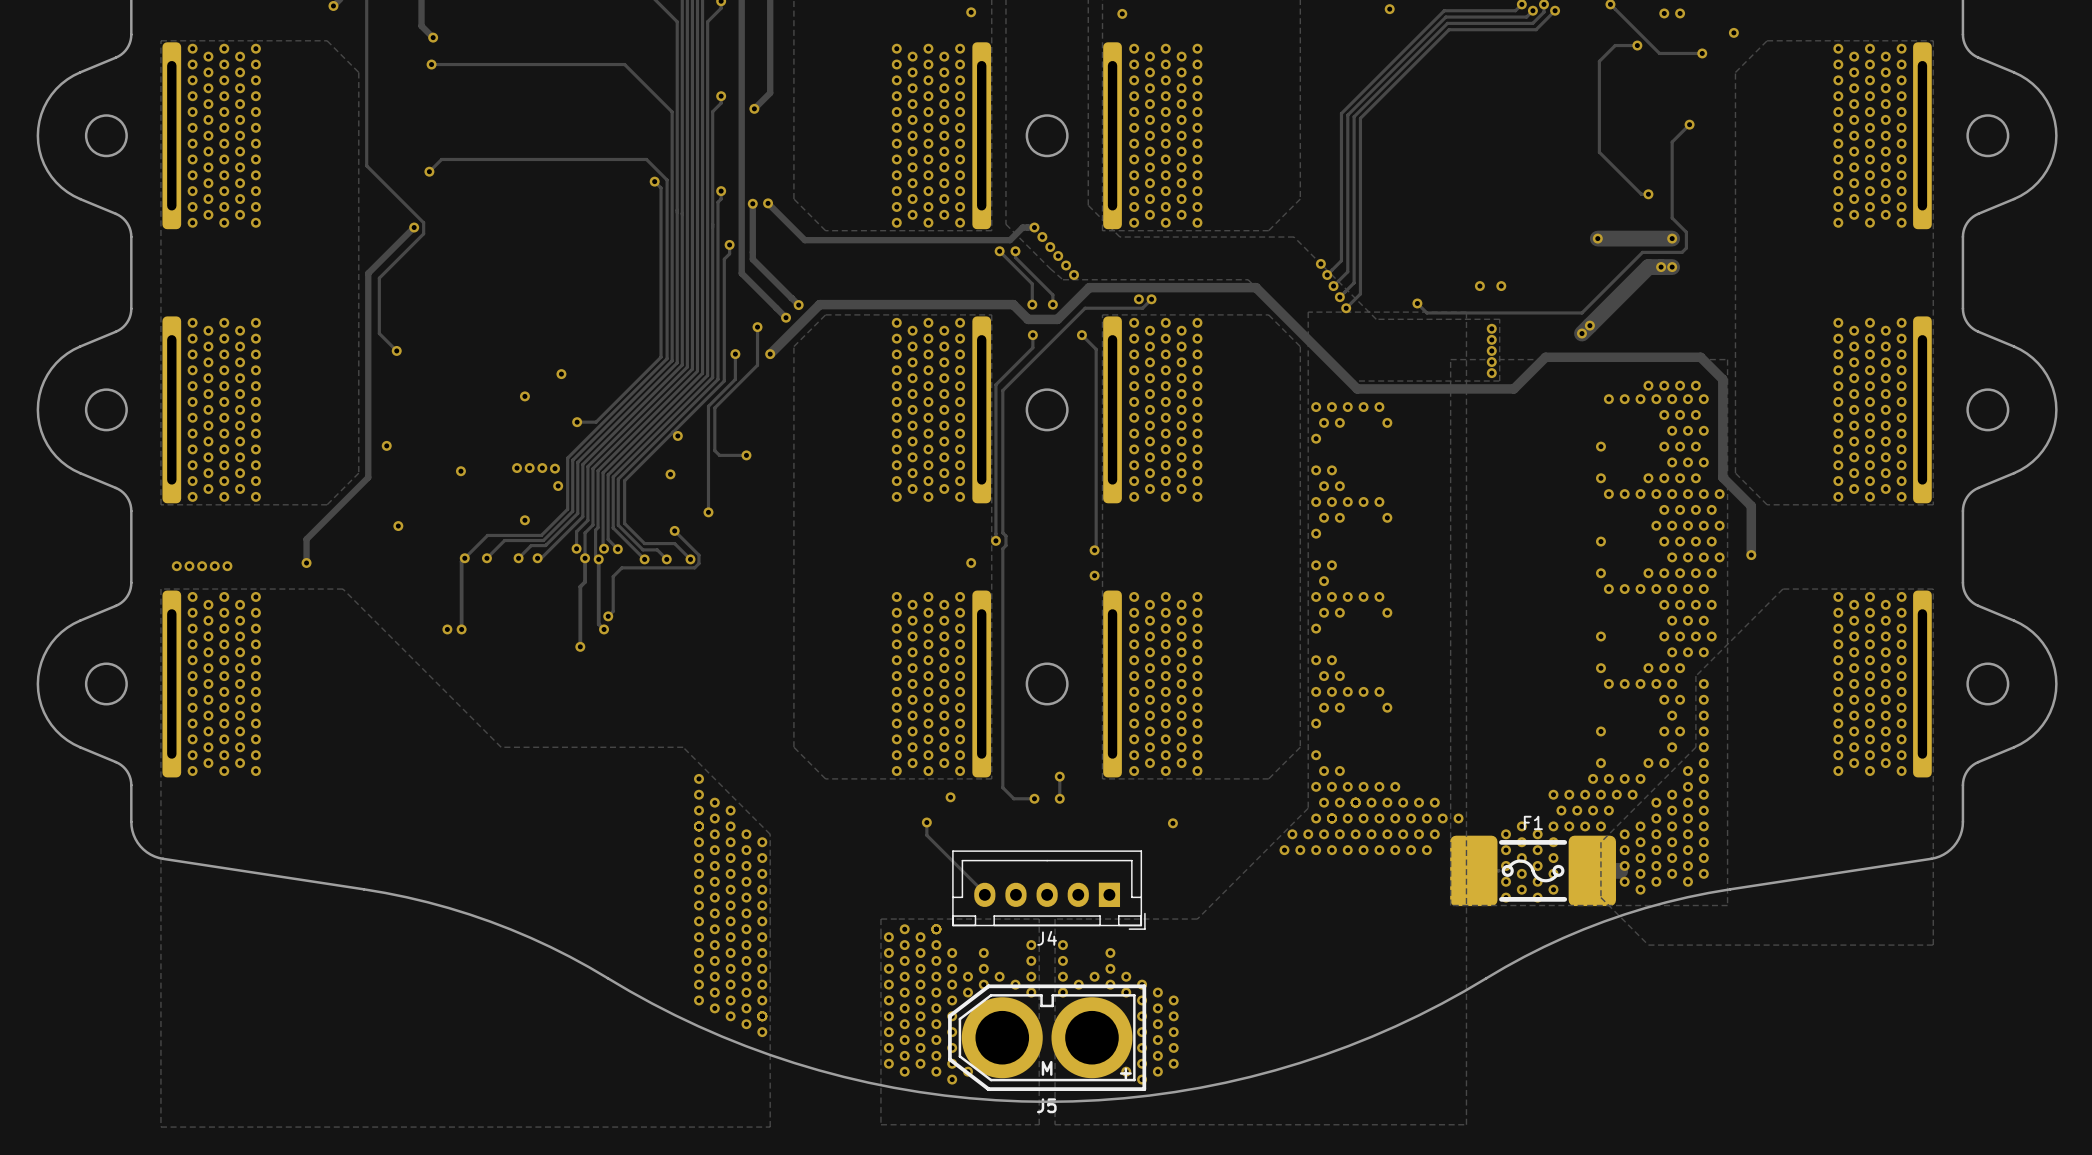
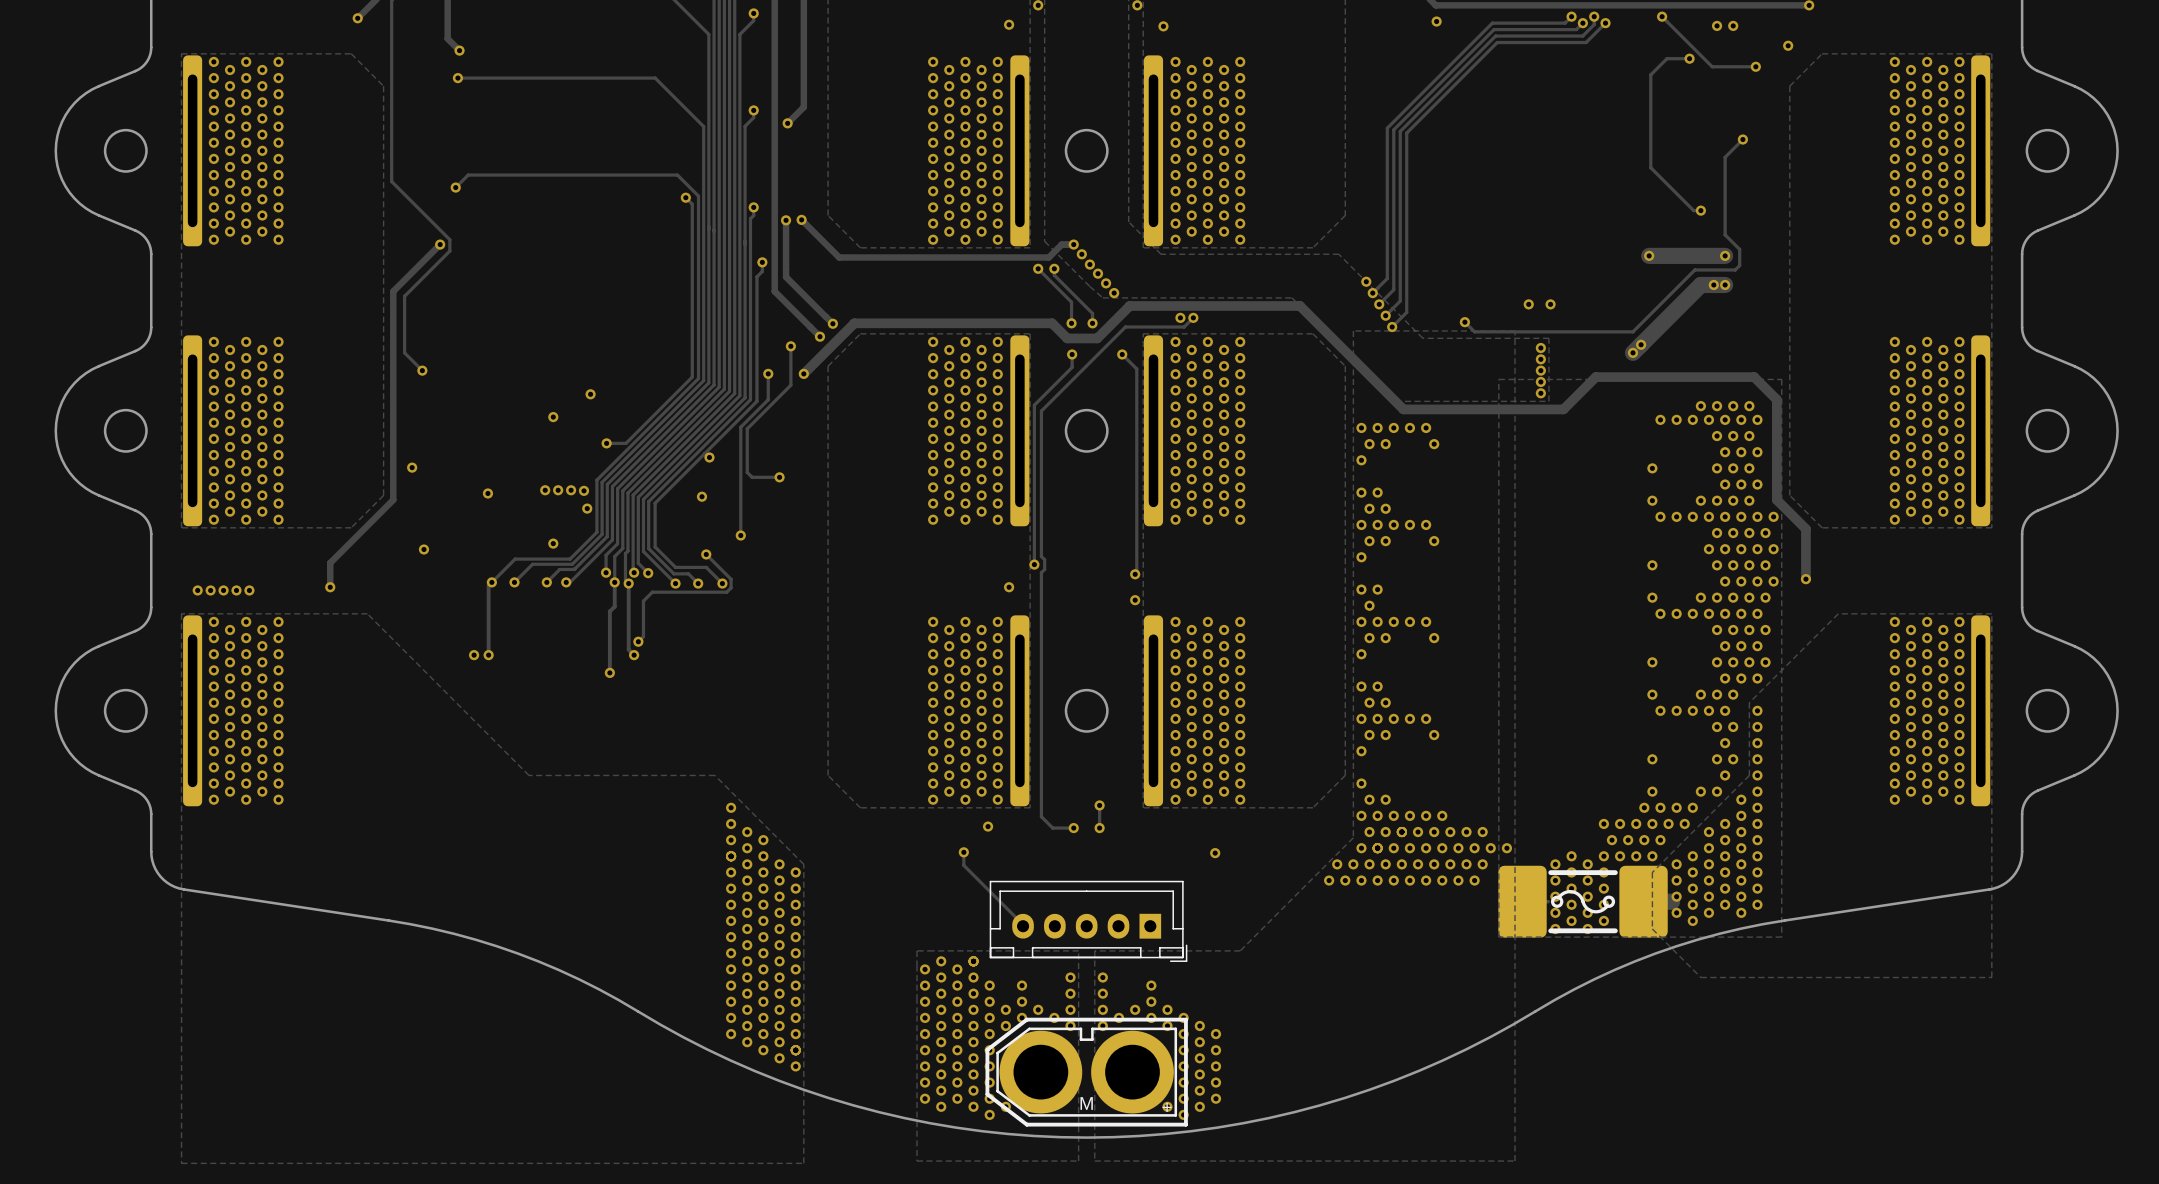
F1 name: F1 (1533, 822) -> none
J4 name: J4 (1047, 938) -> none
J5 name: J5 (1046, 1105) -> none

